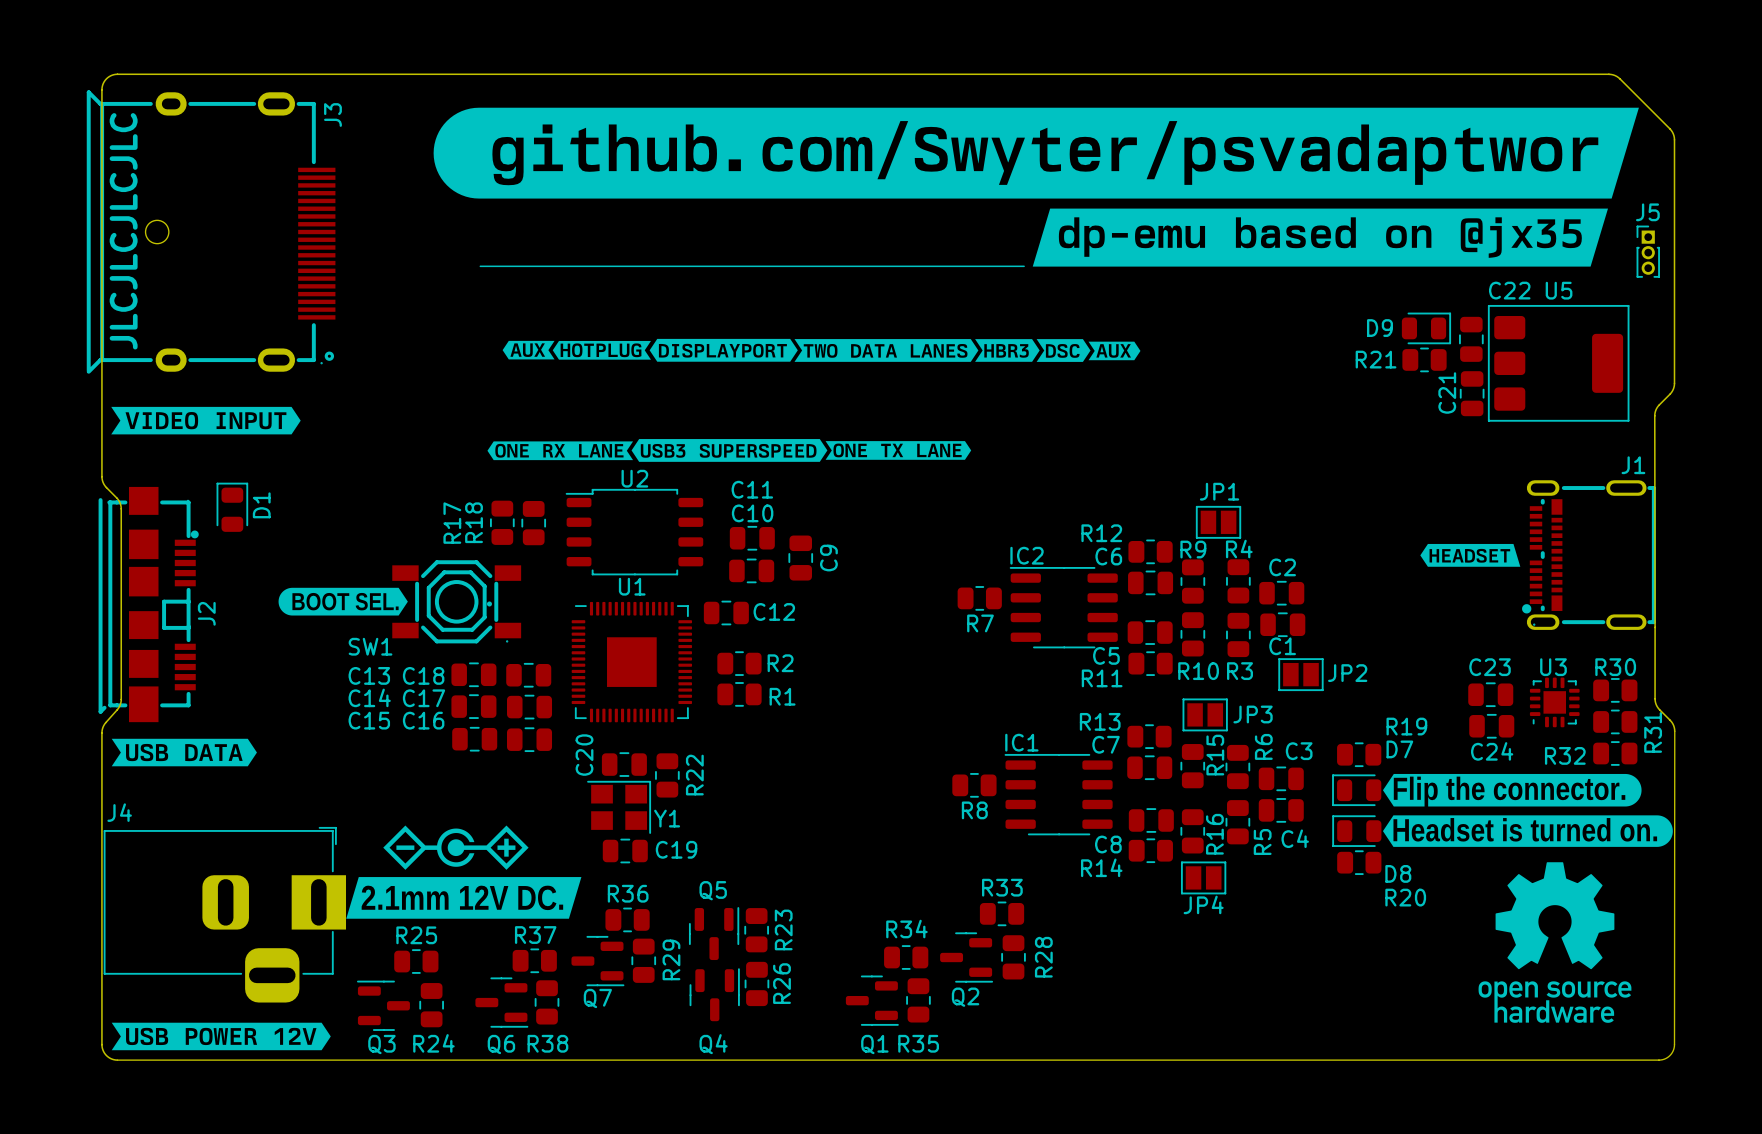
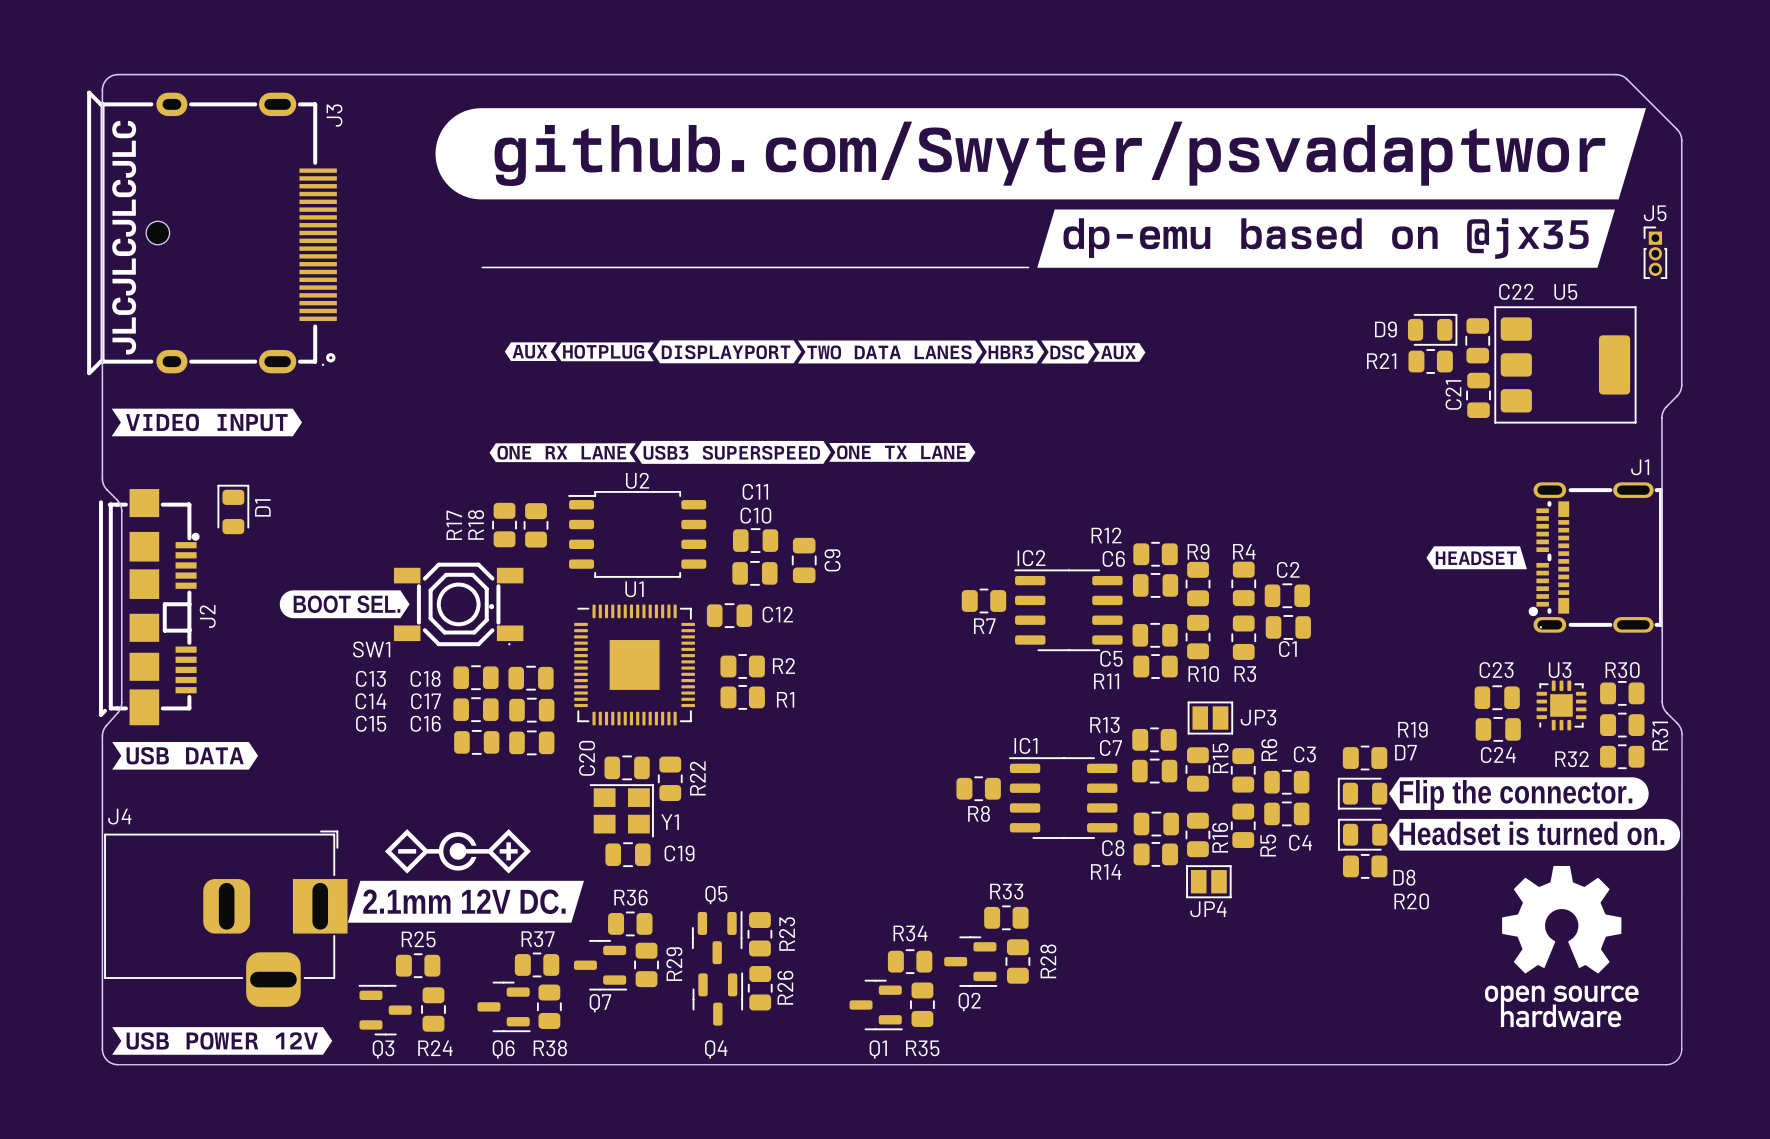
JP1: (1218, 522) -> none
JP2: (1300, 674) -> none

